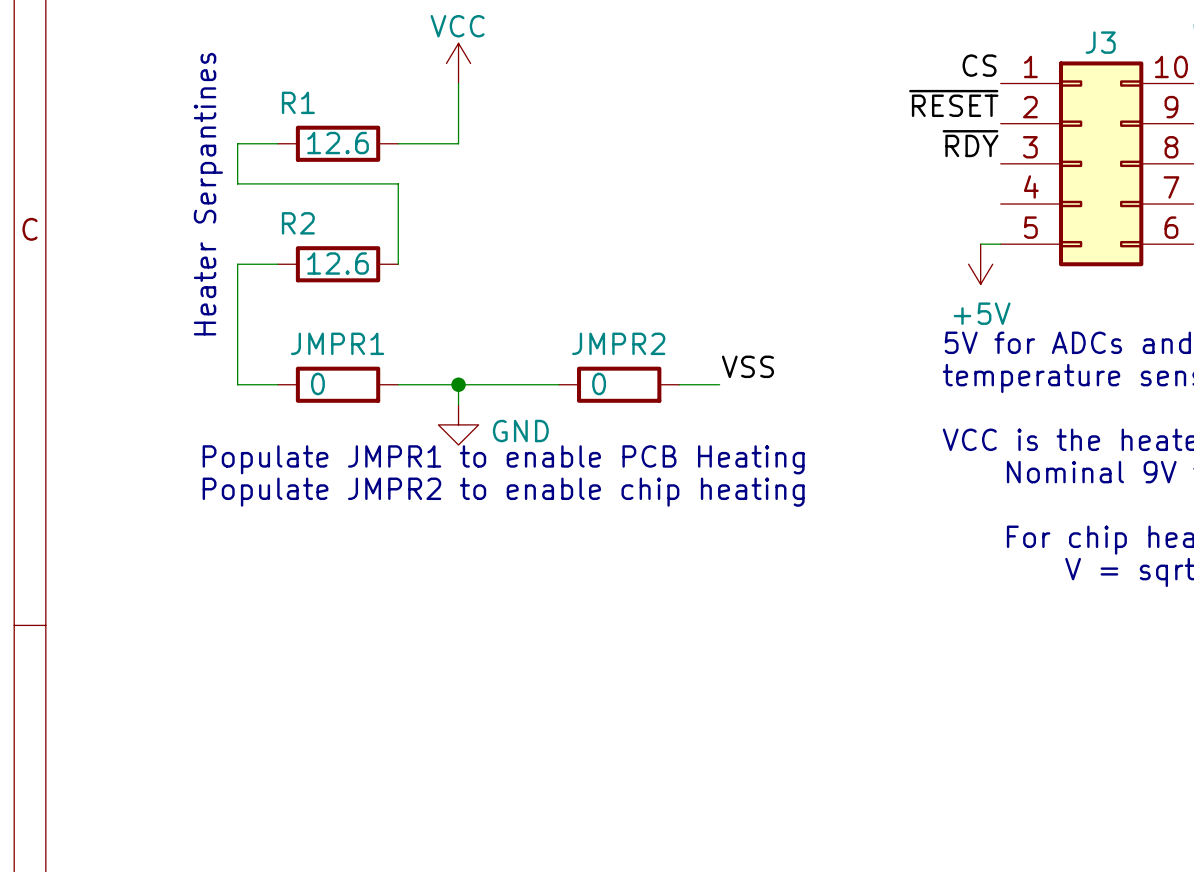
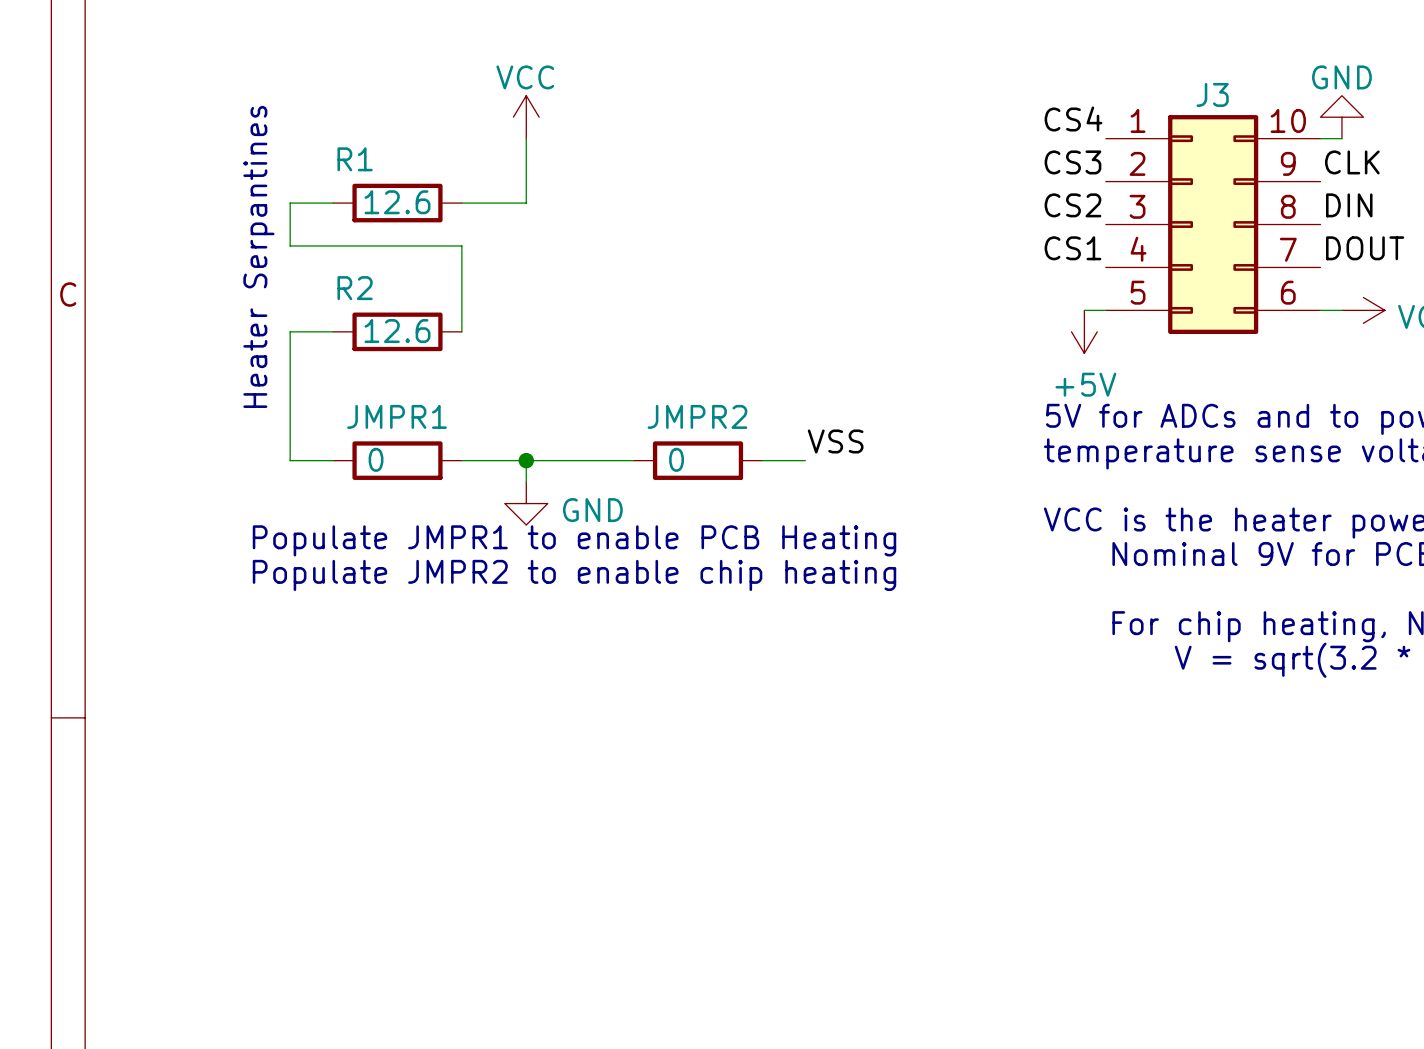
label: CS (979, 65) -> CS4 (1073, 119)
label: ~{RESET} (953, 103) -> CS3 (1072, 162)
label: ~{RDY} (970, 143) -> CS2 (1072, 205)
label: none -> CS1 (1072, 248)

